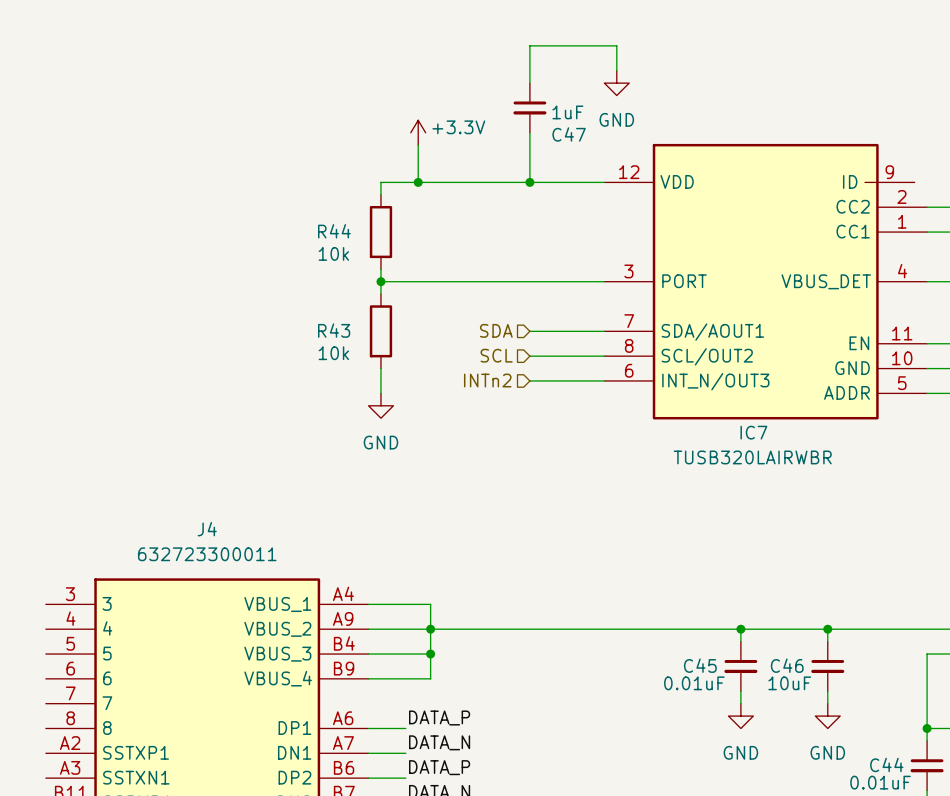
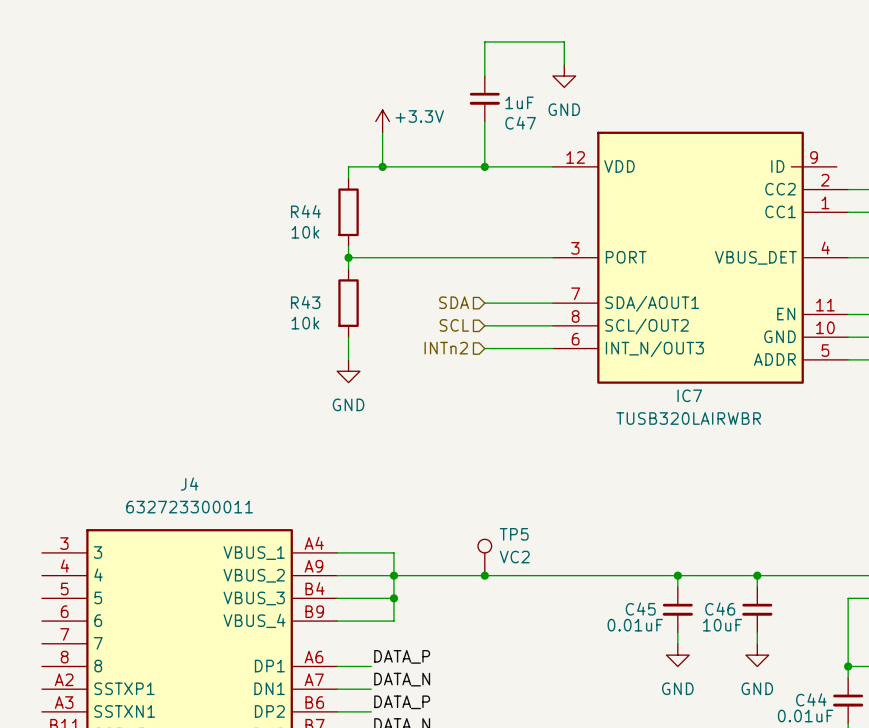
TP5: none -> VC2 (484, 557)
junction: none -> (484, 575)

